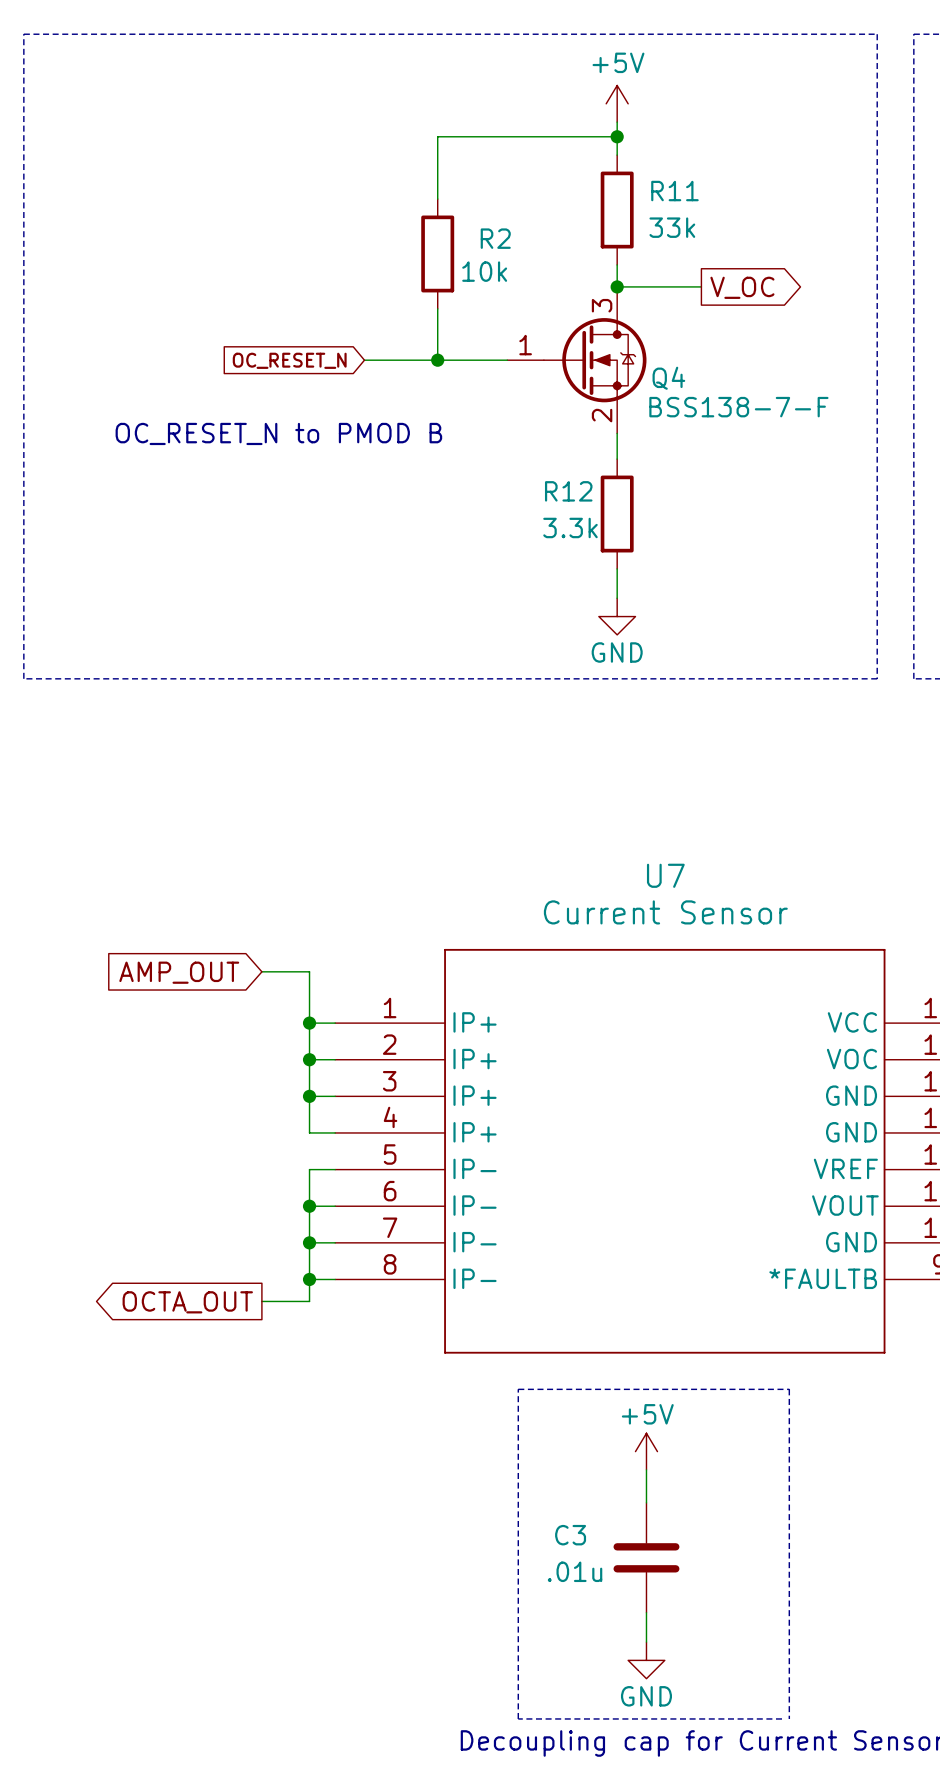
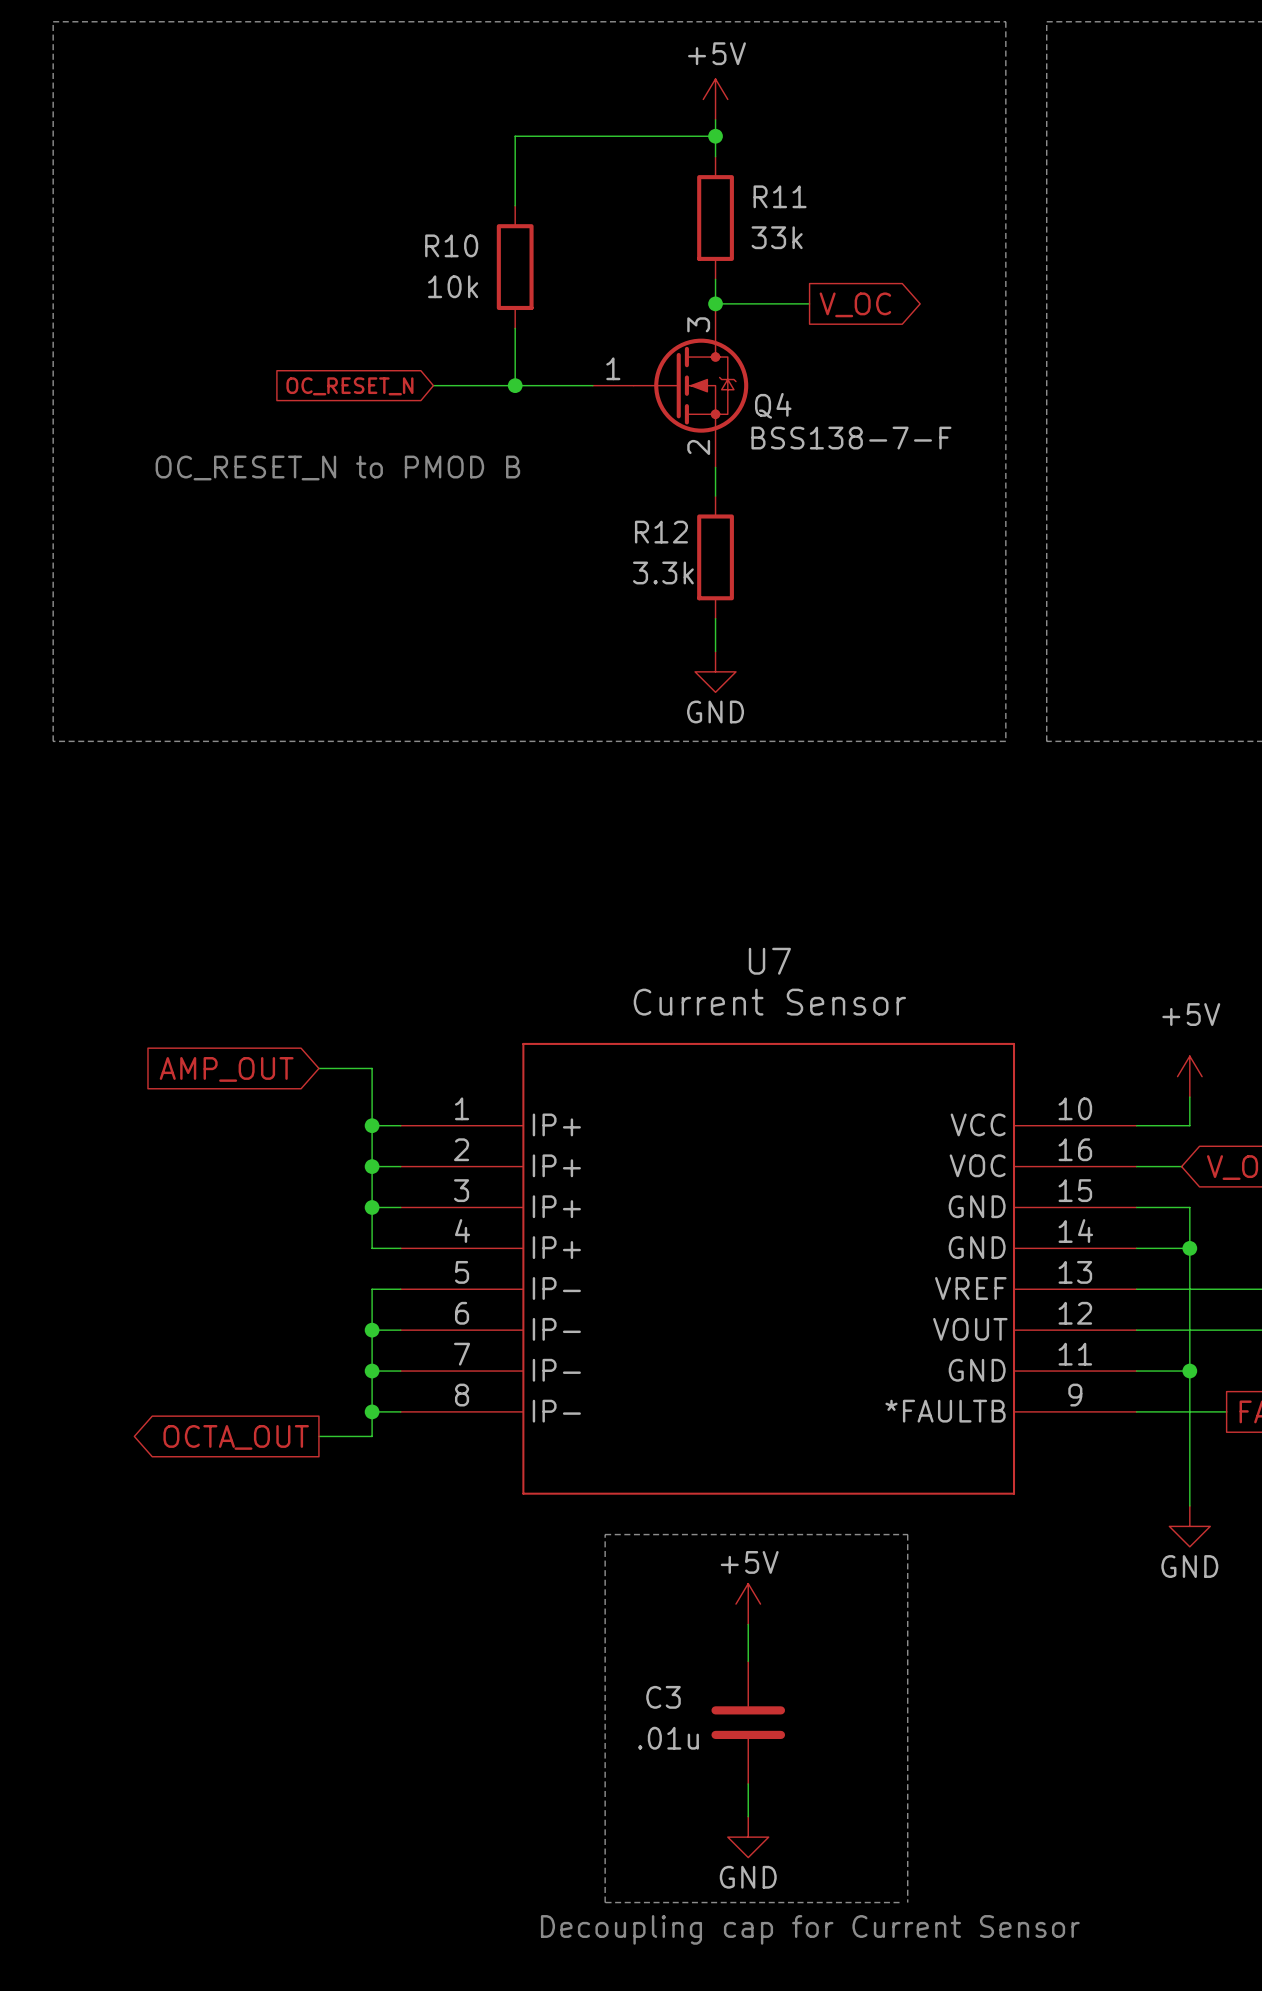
R2 name: R2 (495, 238) -> R10 (451, 245)
R2 value position: 10k (484, 271) -> 10k (453, 286)

